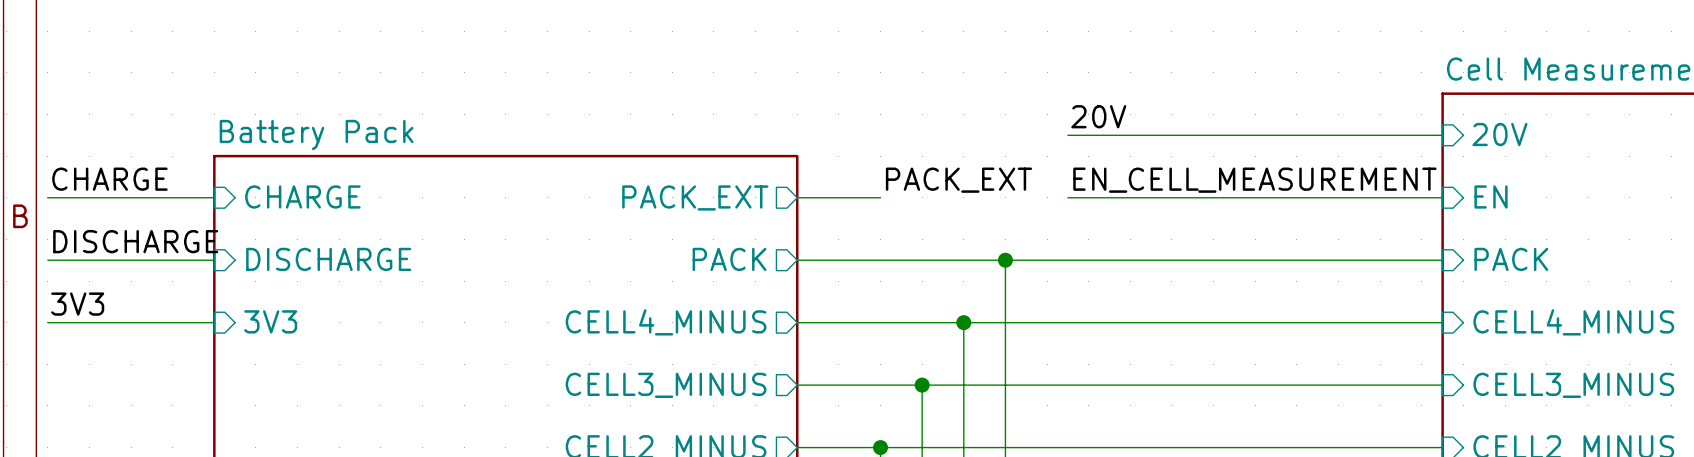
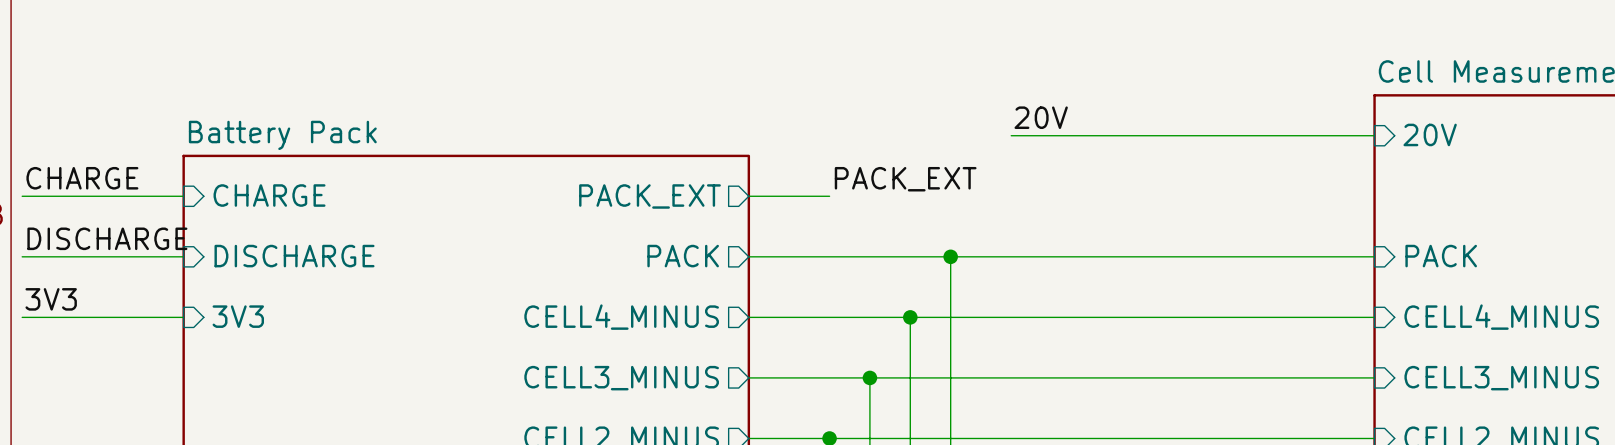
label: EN_CELL_MEASUREMENT (1254, 180) -> none
sheet pin: EN (1491, 196) -> none
wire: (1067, 197) (1442, 197) -> none

